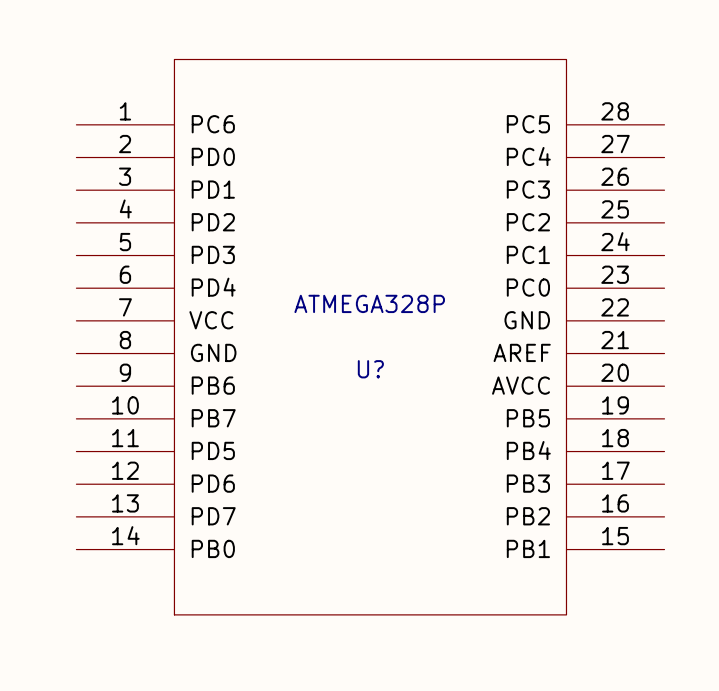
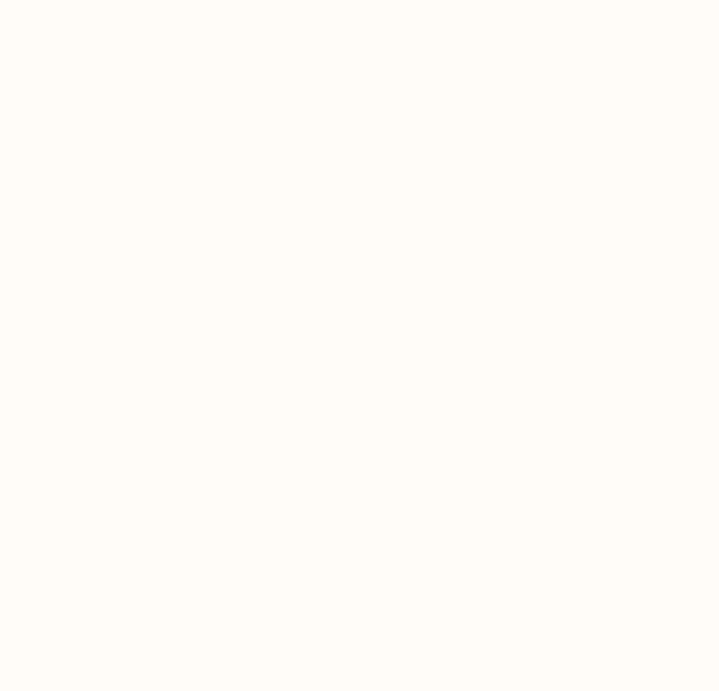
U?: ATMEGA328P (370, 337) -> none

